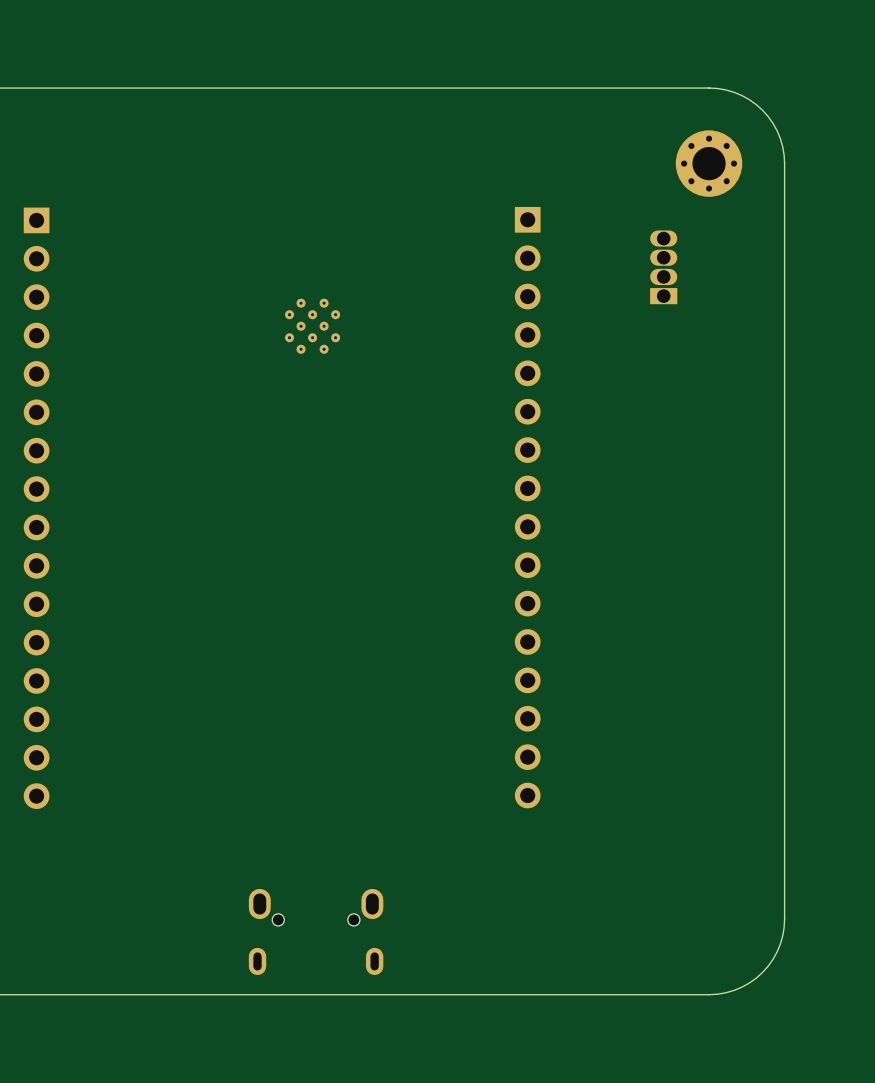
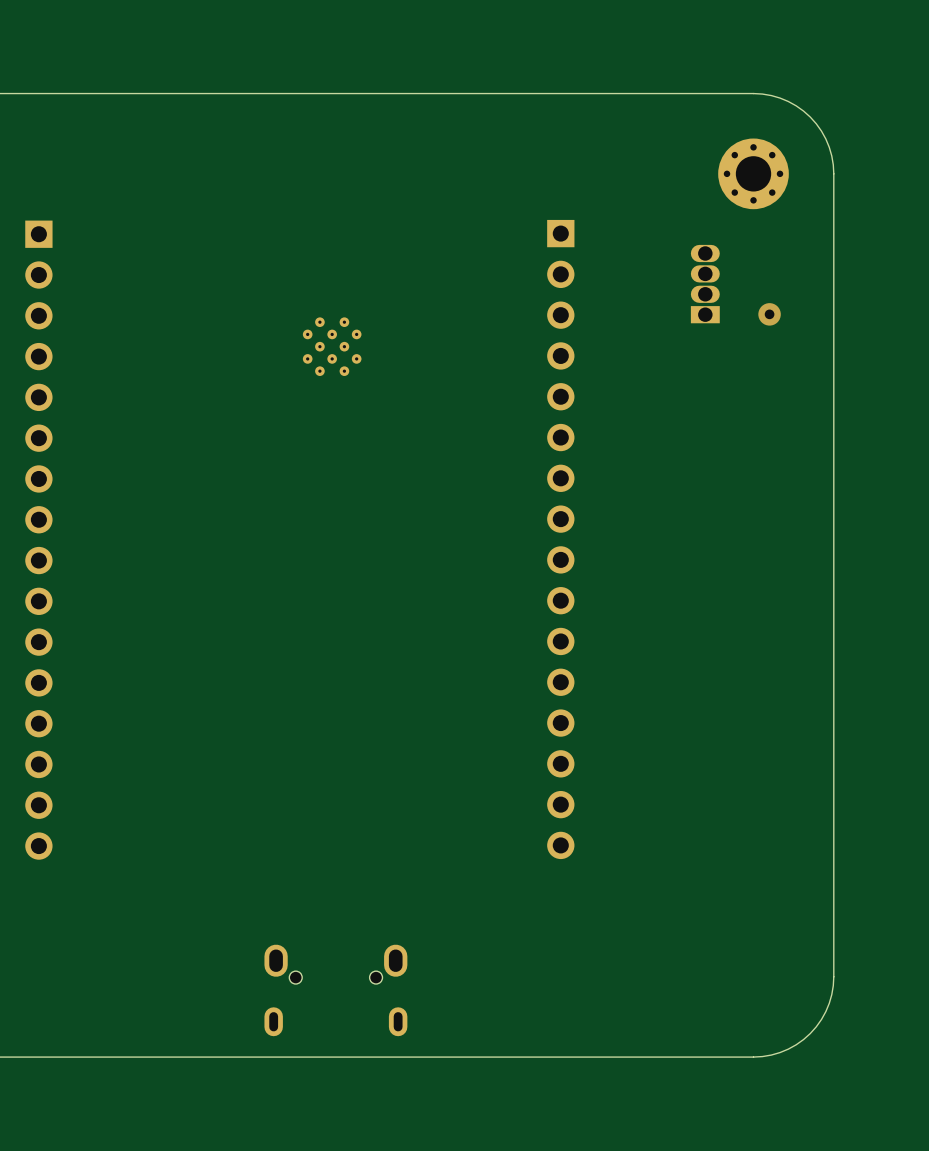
via: none -> (769, 314)

